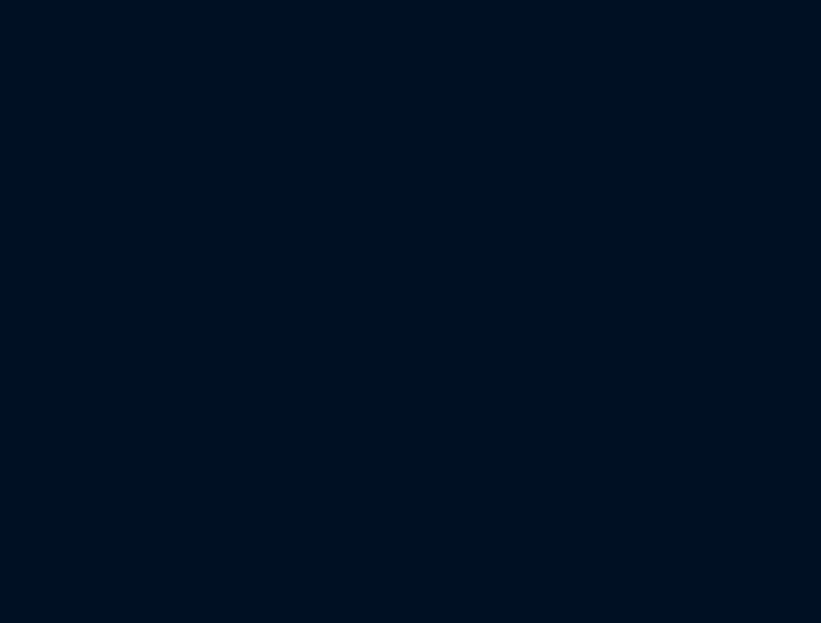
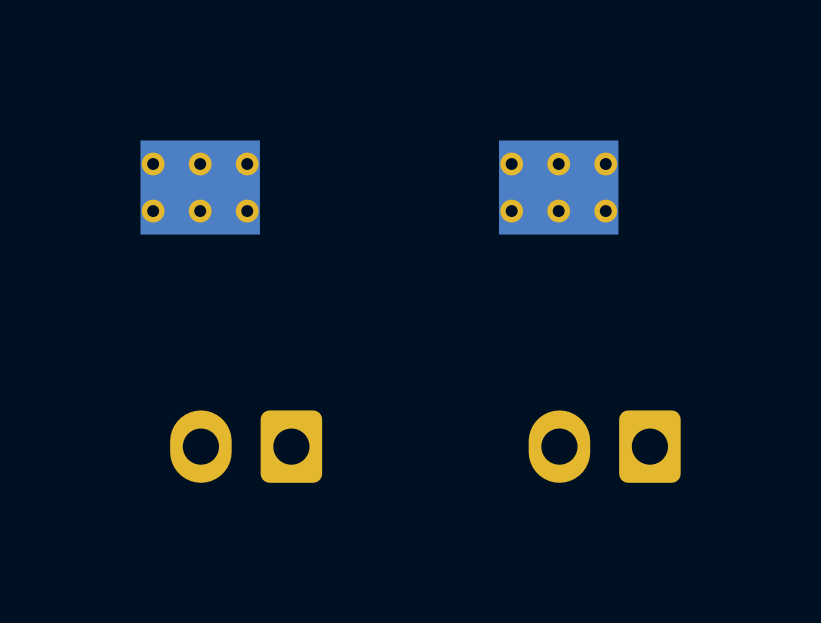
part: none -> (200, 187)
part: none -> (558, 187)
part: none -> (246, 446)
part: none -> (604, 446)

